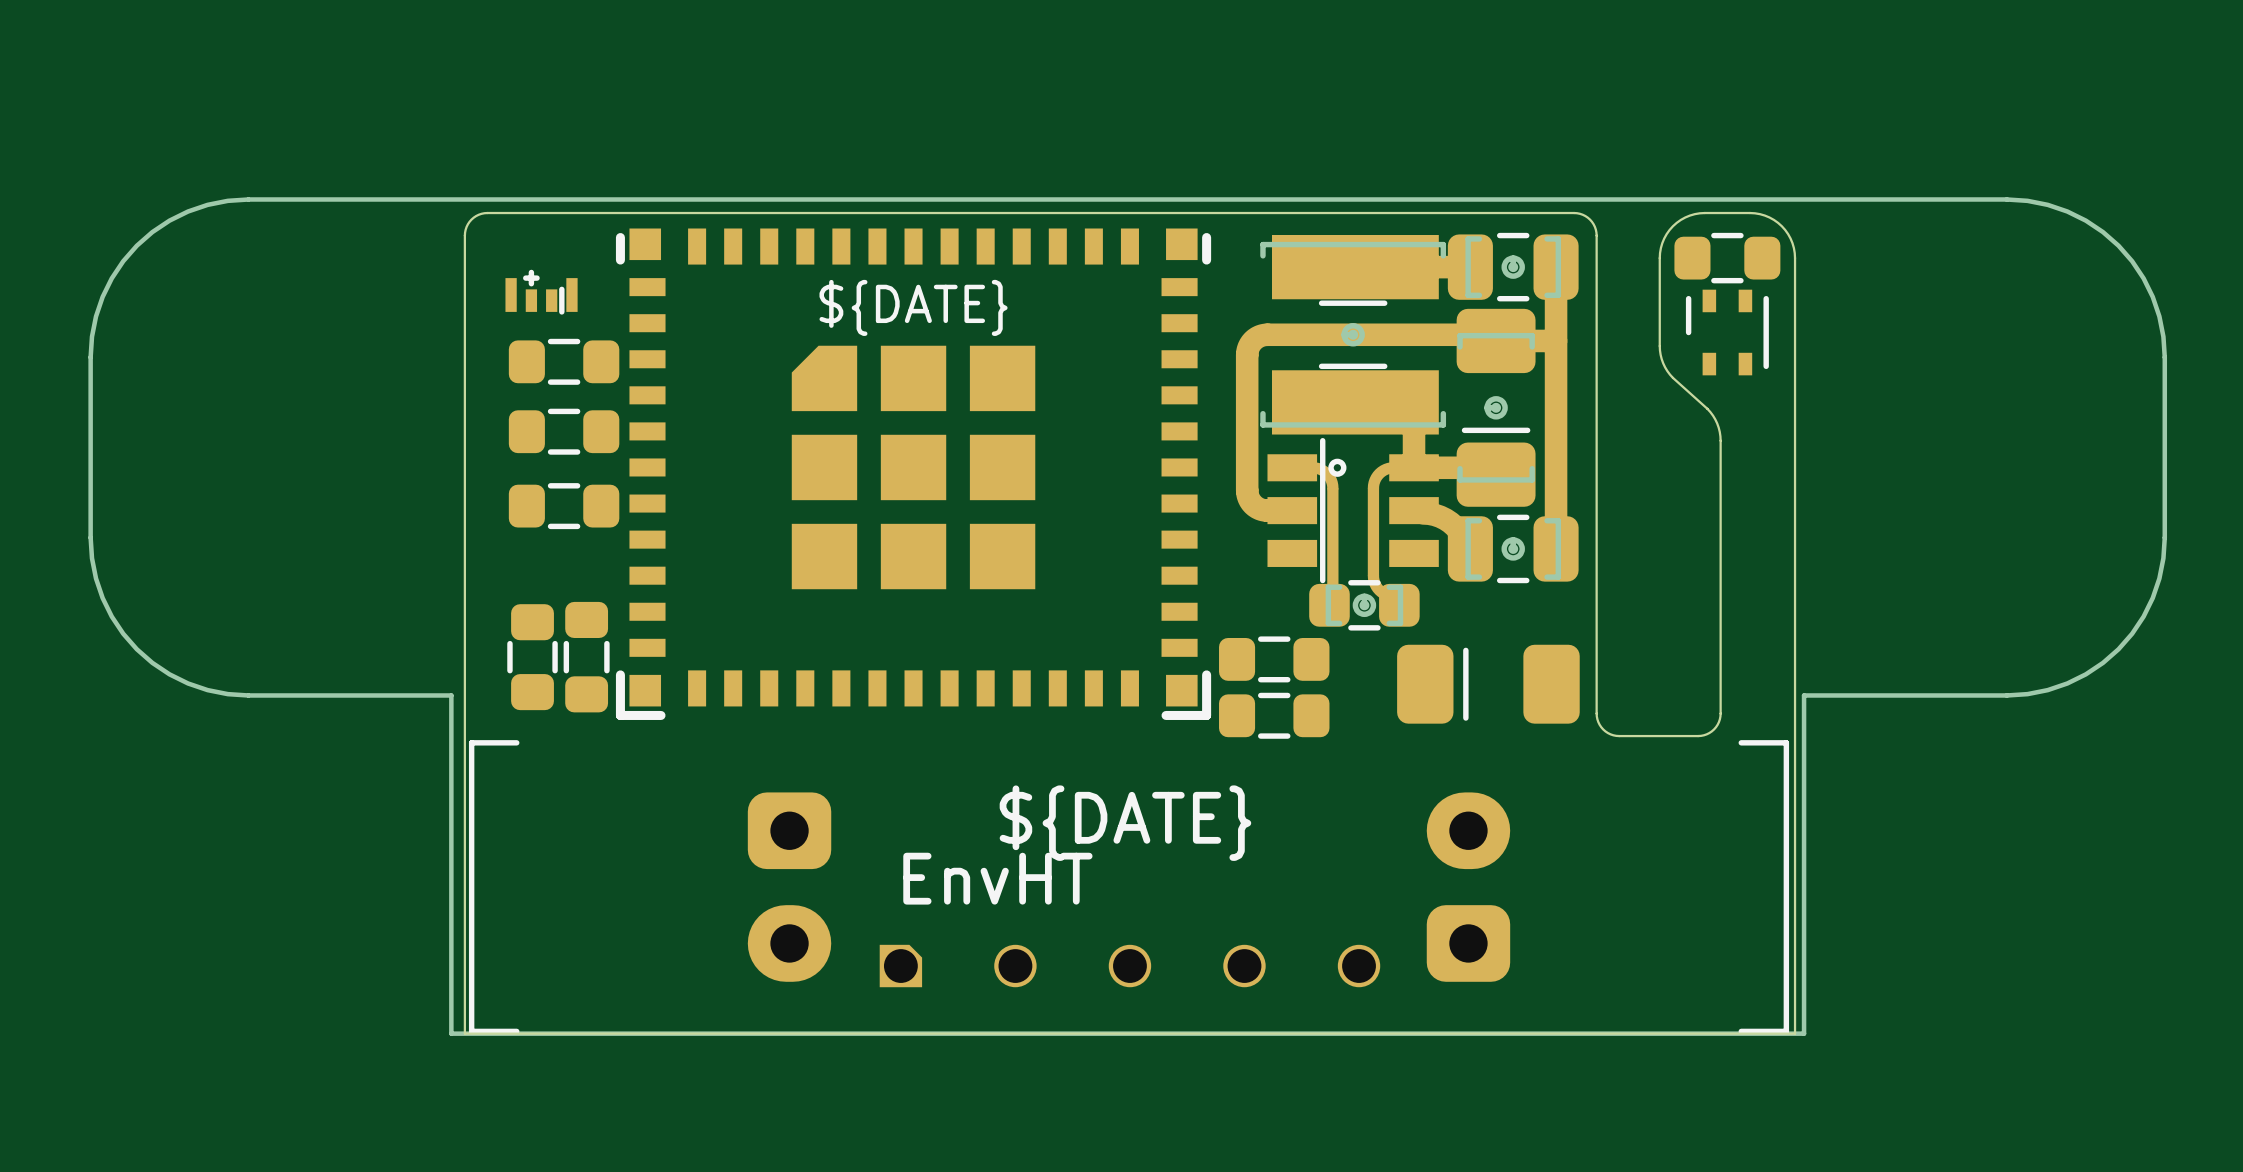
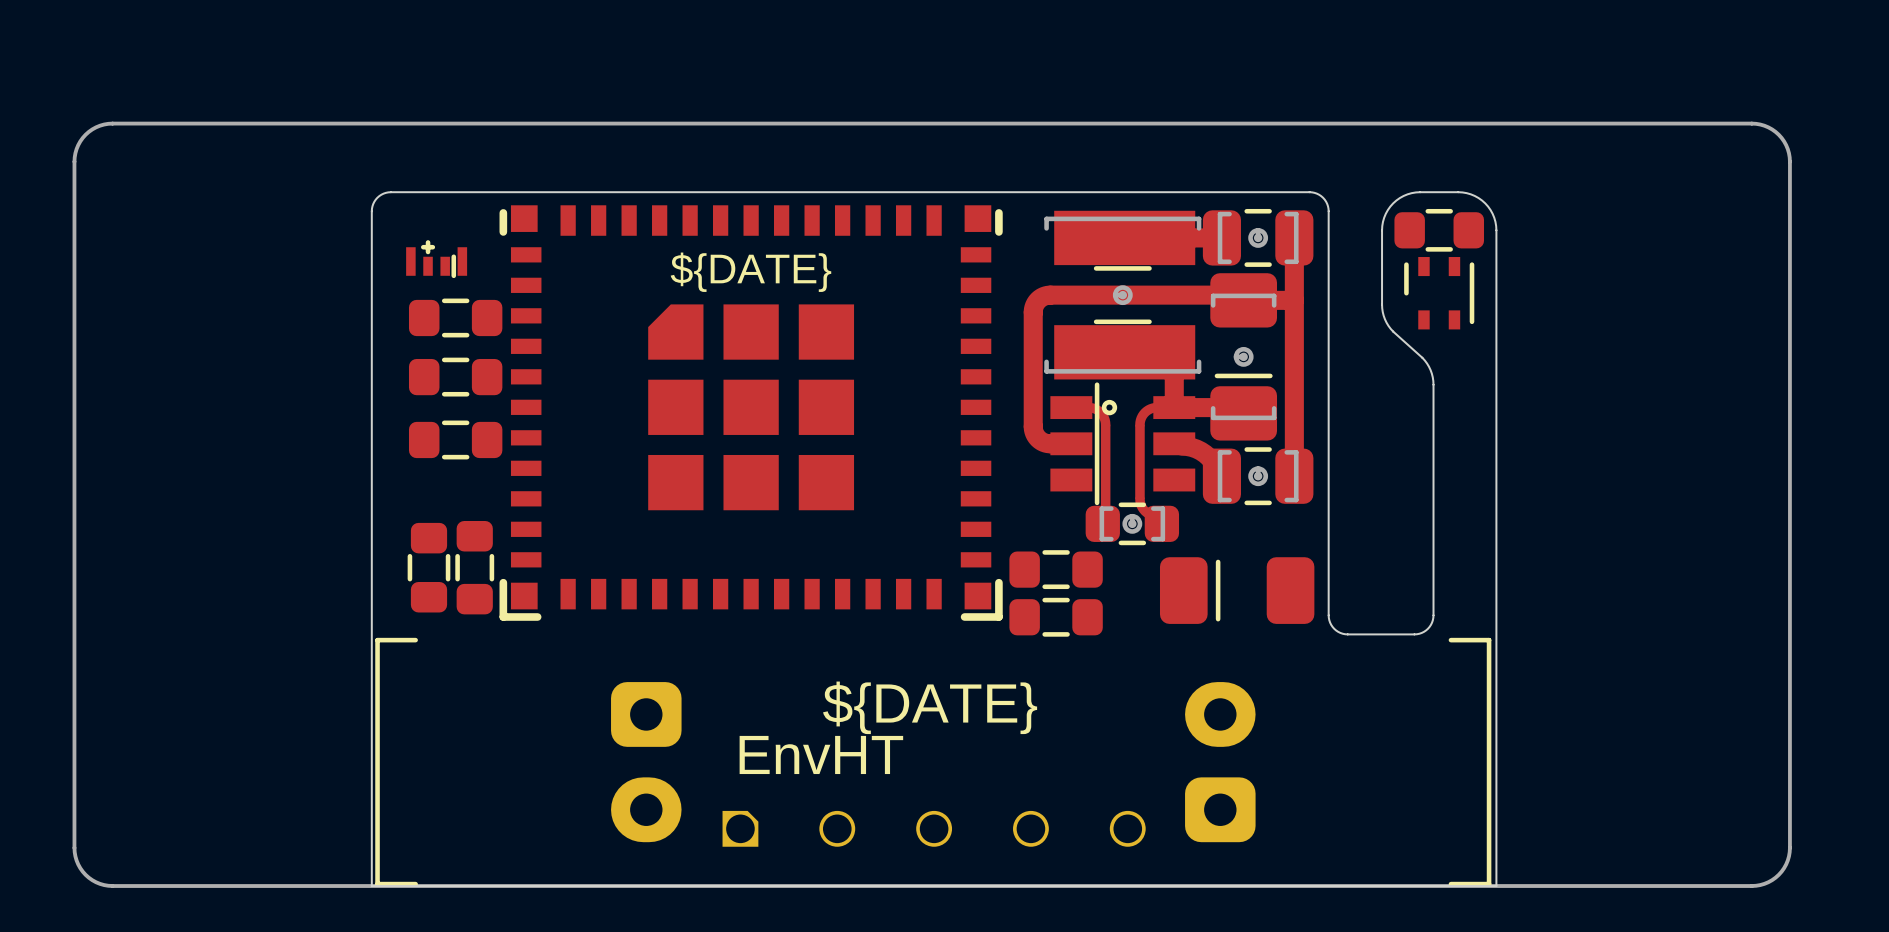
line: (451, 1033) (451, 695) (248, 695) (207, 690) (188, 683) (152, 662) (123, 633) (102, 598) (91, 558) (90, 537) (91, 336) (102, 296) (123, 261) (152, 232) (169, 220) (207, 204) (248, 199) (2006, 199) (2047, 204) (2085, 220) (2118, 245) (2143, 278) (2159, 316) (2164, 357) (2164, 537) (2159, 578) (2143, 616) (2118, 649) (2085, 674) (2047, 690) (2006, 695) (1804, 695) (1804, 1033) -> (360, 886) (108, 885) (88, 877) (76, 860) (74, 847) (74, 161) (76, 149) (82, 137) (99, 125) (112, 123) (1751, 123) (1768, 127) (1784, 141) (1789, 161) (1789, 847) (1787, 860) (1775, 877) (1756, 885) (1504, 886)

